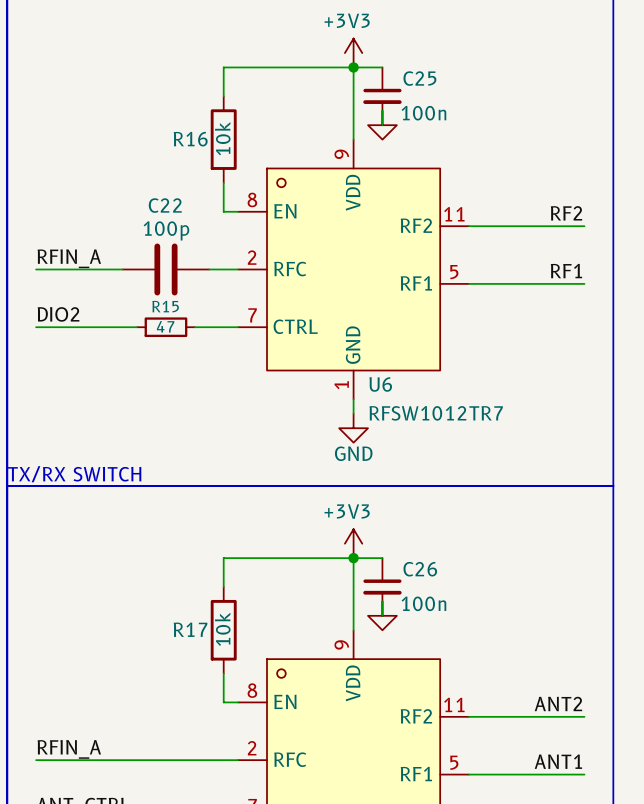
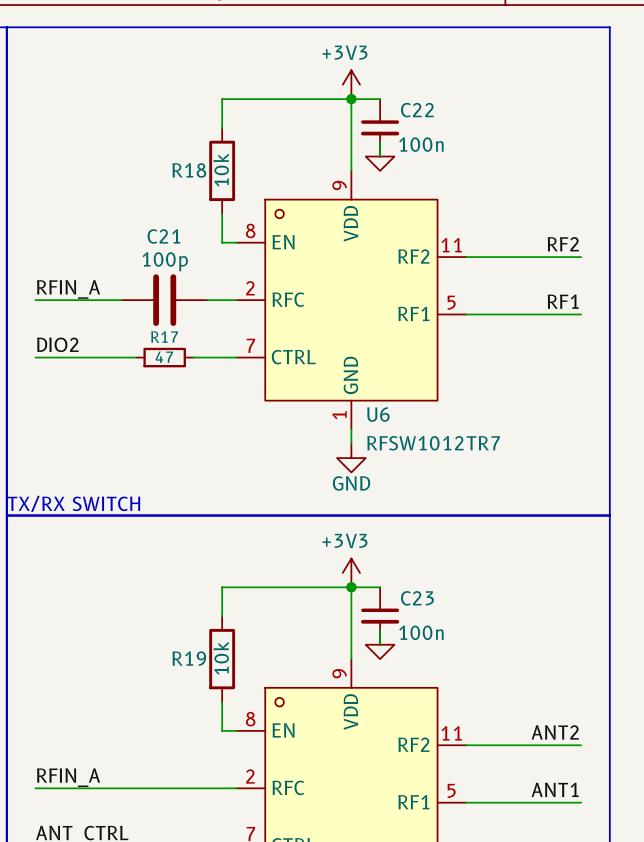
C25 name: C25 (419, 78) -> C22 (417, 110)
R16 name: R16 (190, 139) -> R18 (189, 170)
C22 name: C22 (165, 205) -> C21 (163, 236)
R15 name: R15 (165, 306) -> R17 (164, 337)
C26 name: C26 (420, 569) -> C23 (417, 598)
R17 name: R17 (190, 629) -> R19 (189, 658)

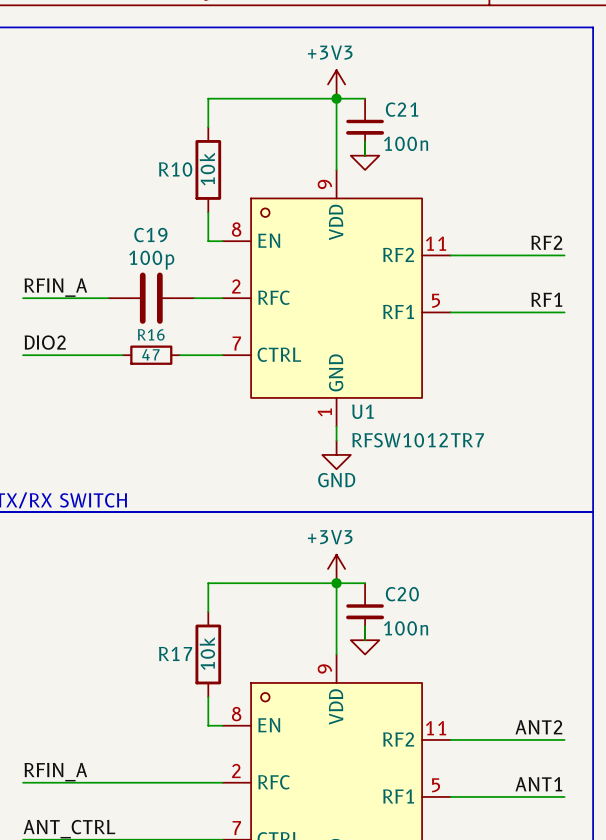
C22 name: C22 (417, 110) -> C21 (402, 109)
R18 name: R18 (189, 170) -> R10 (175, 169)
C21 name: C21 (163, 236) -> C19 (150, 235)
R17 name: R17 (164, 337) -> R16 (151, 334)
U6 name: U6 (378, 414) -> U1 (363, 411)
C23 name: C23 (417, 598) -> C20 (402, 594)
R19 name: R19 (189, 658) -> R17 (175, 653)

